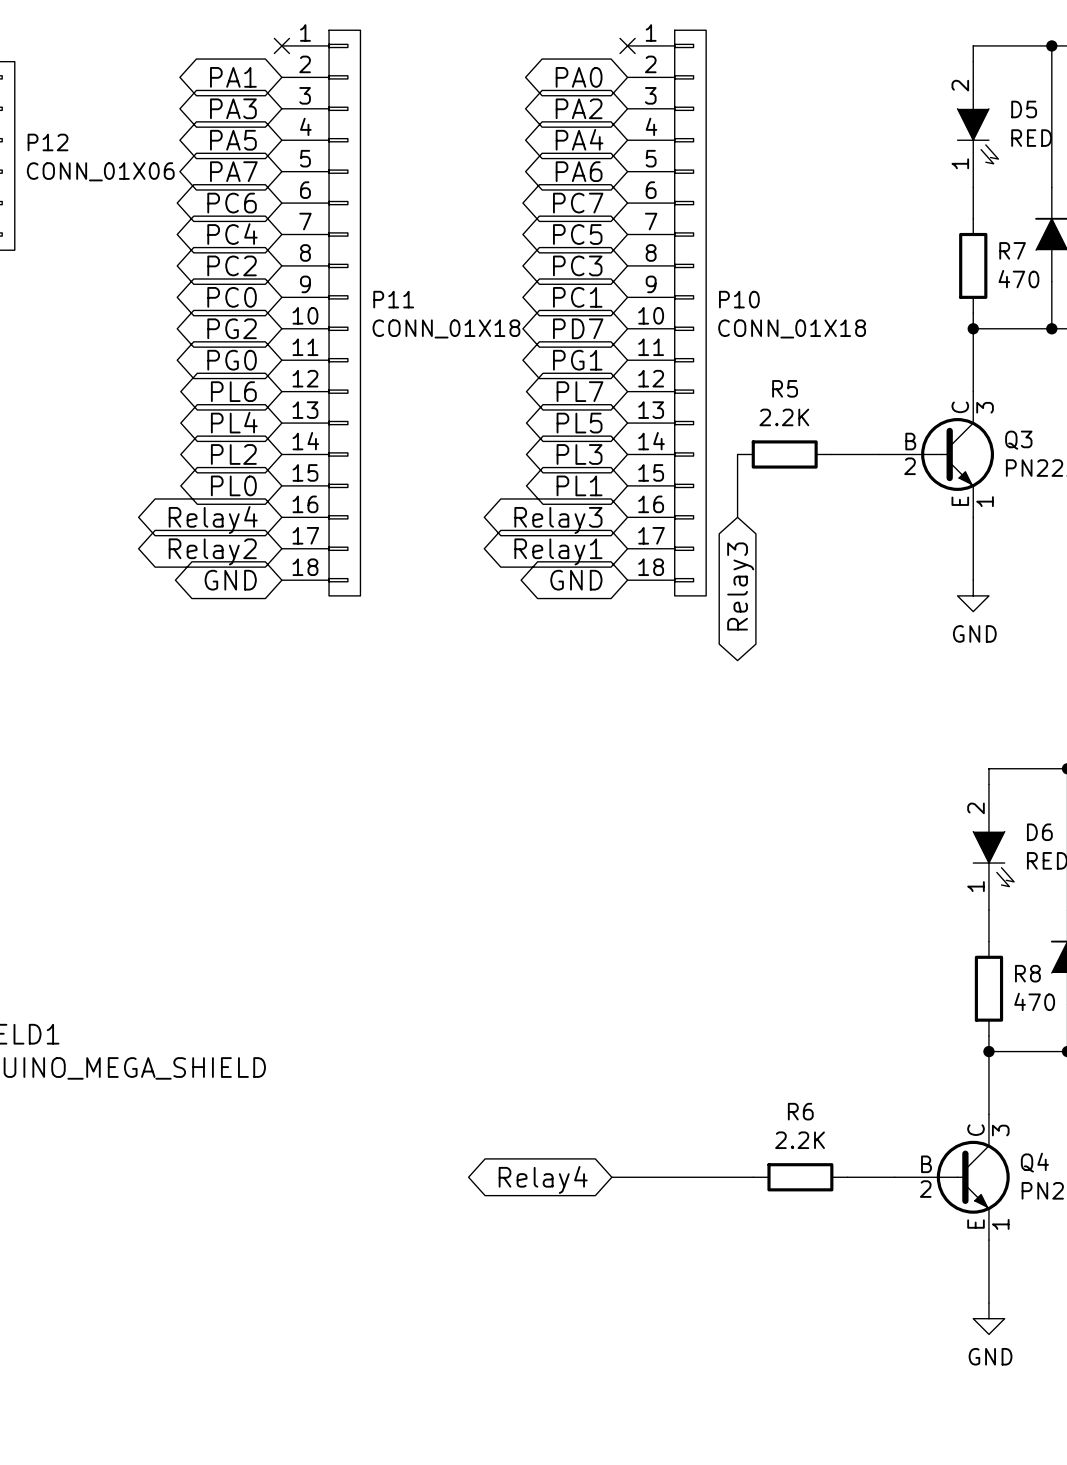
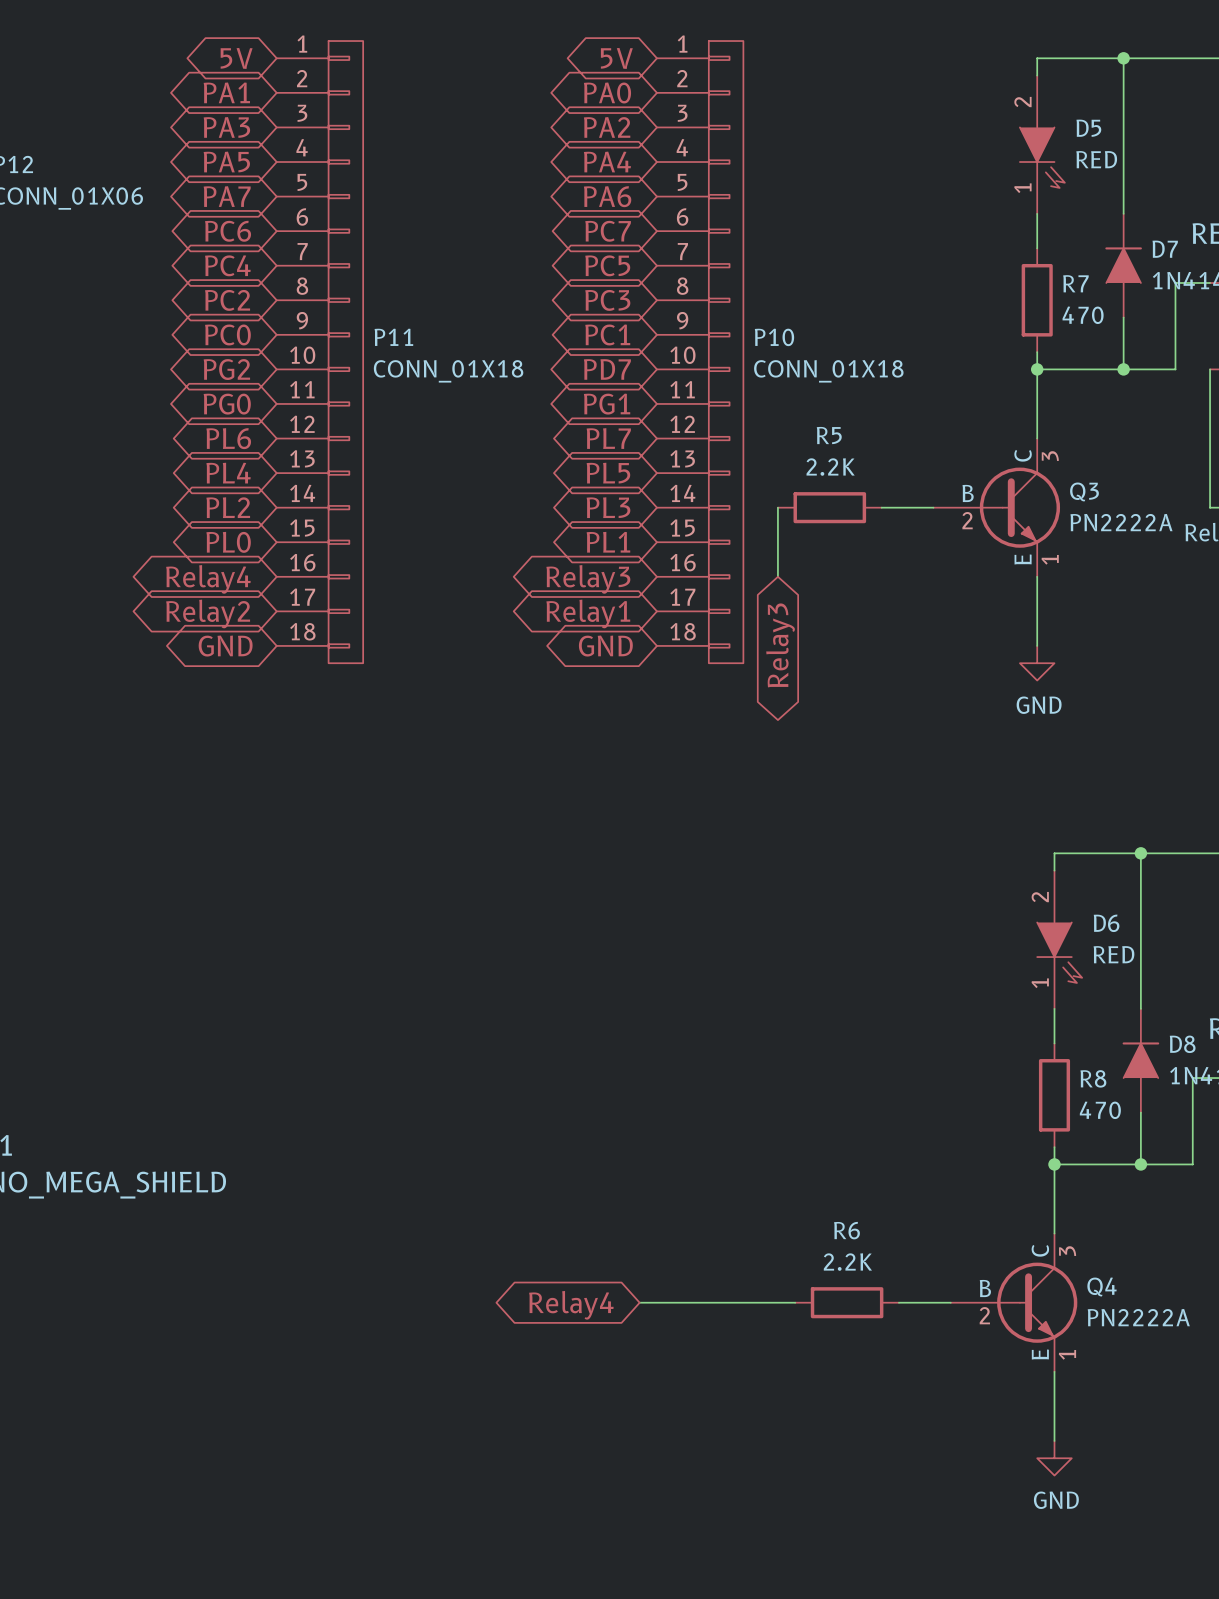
global label: none -> 5V (236, 58)
no-connect mark: (281, 45) -> none
global label: none -> 5V (616, 58)
no-connect mark: (627, 45) -> none

